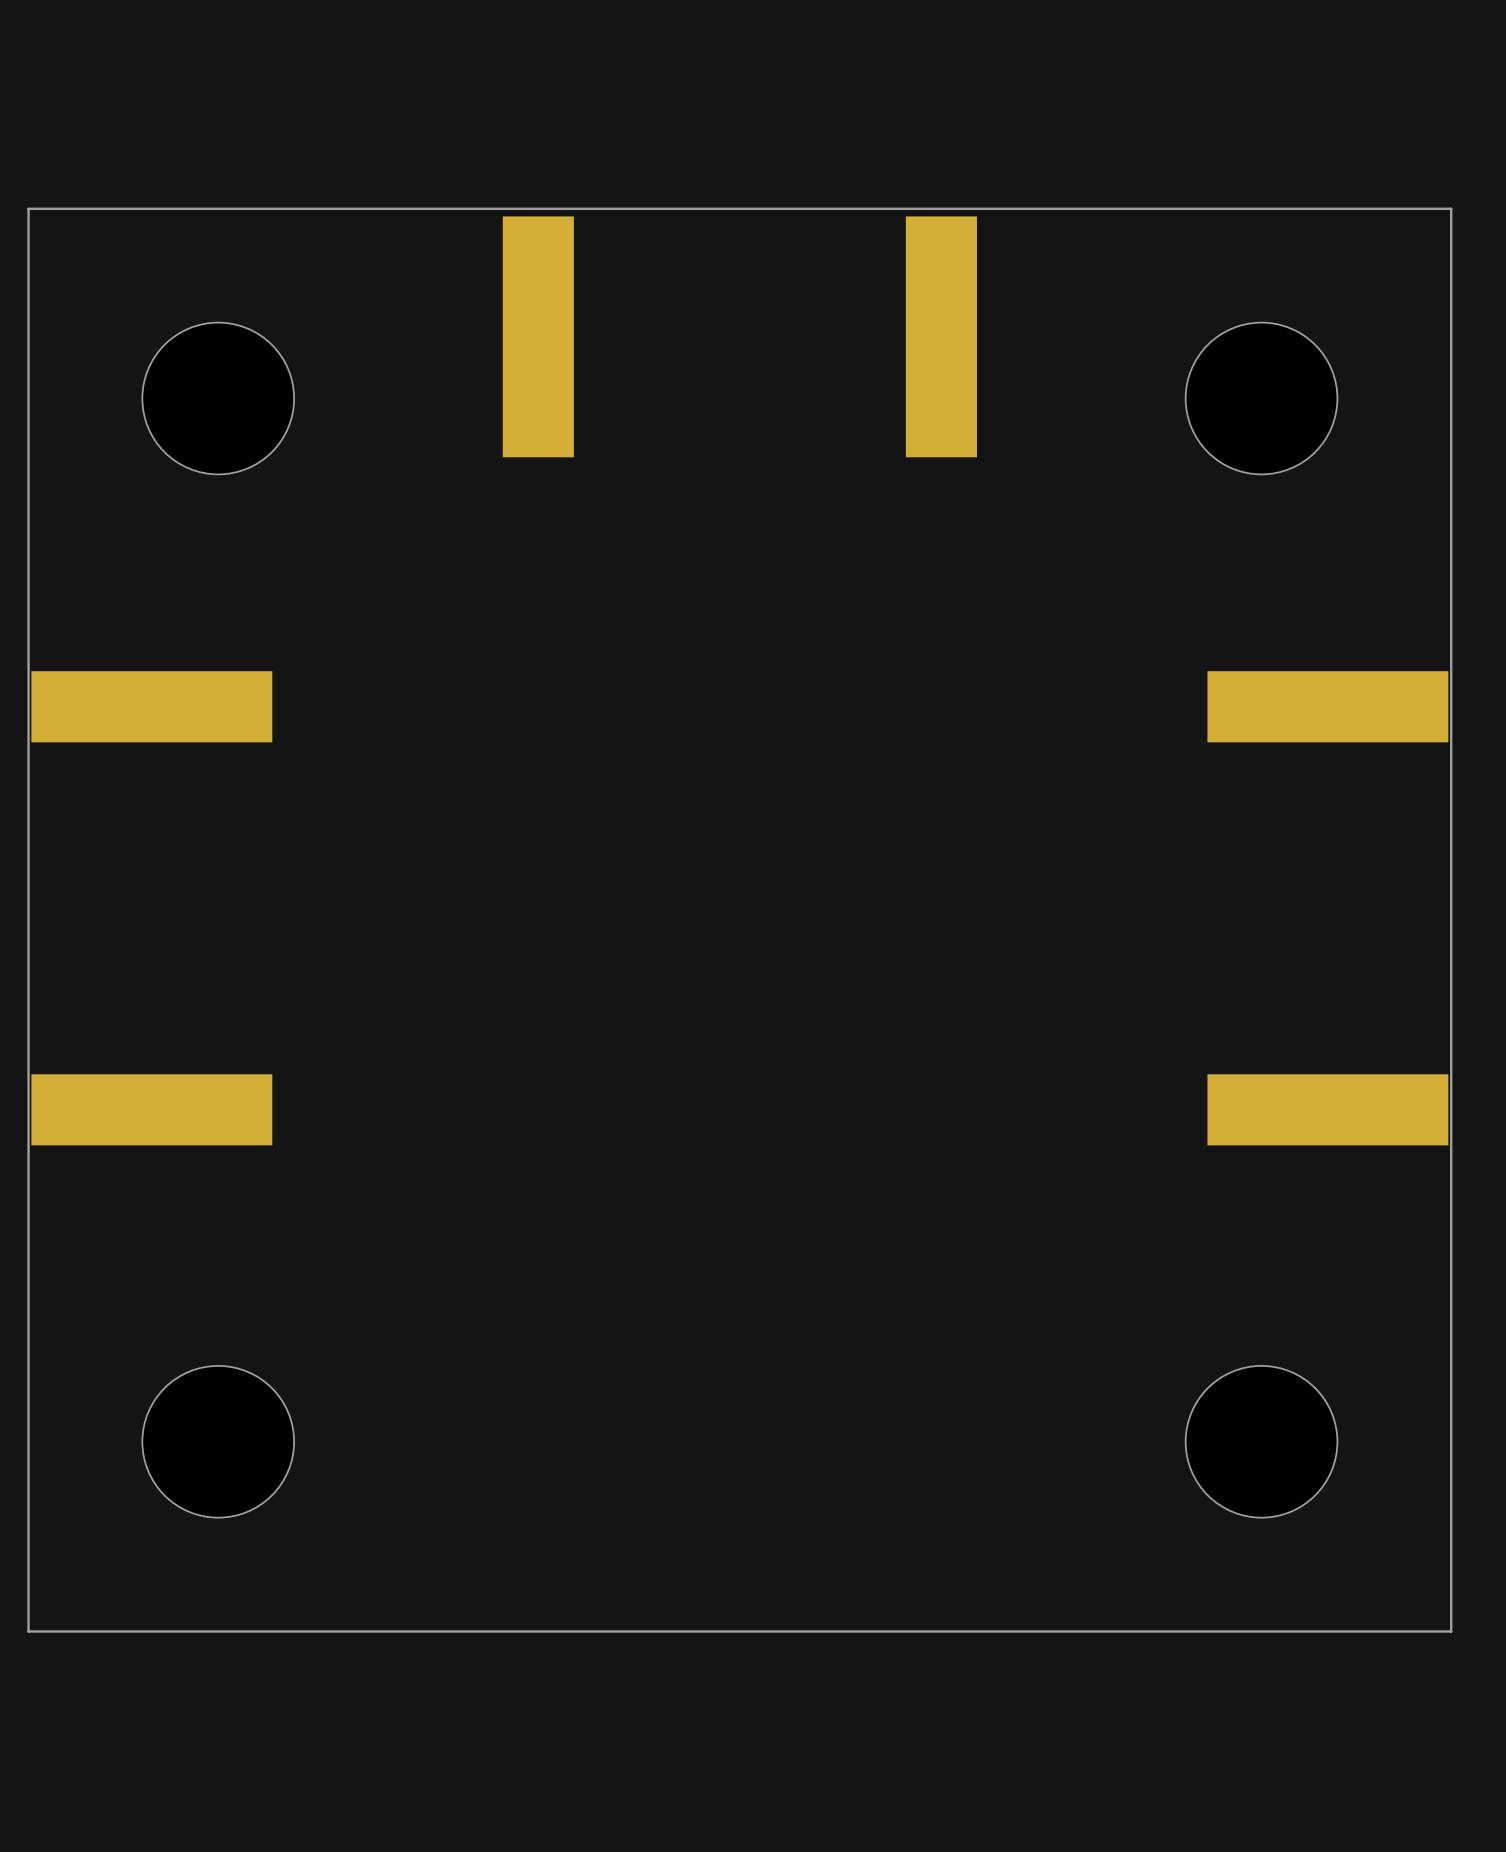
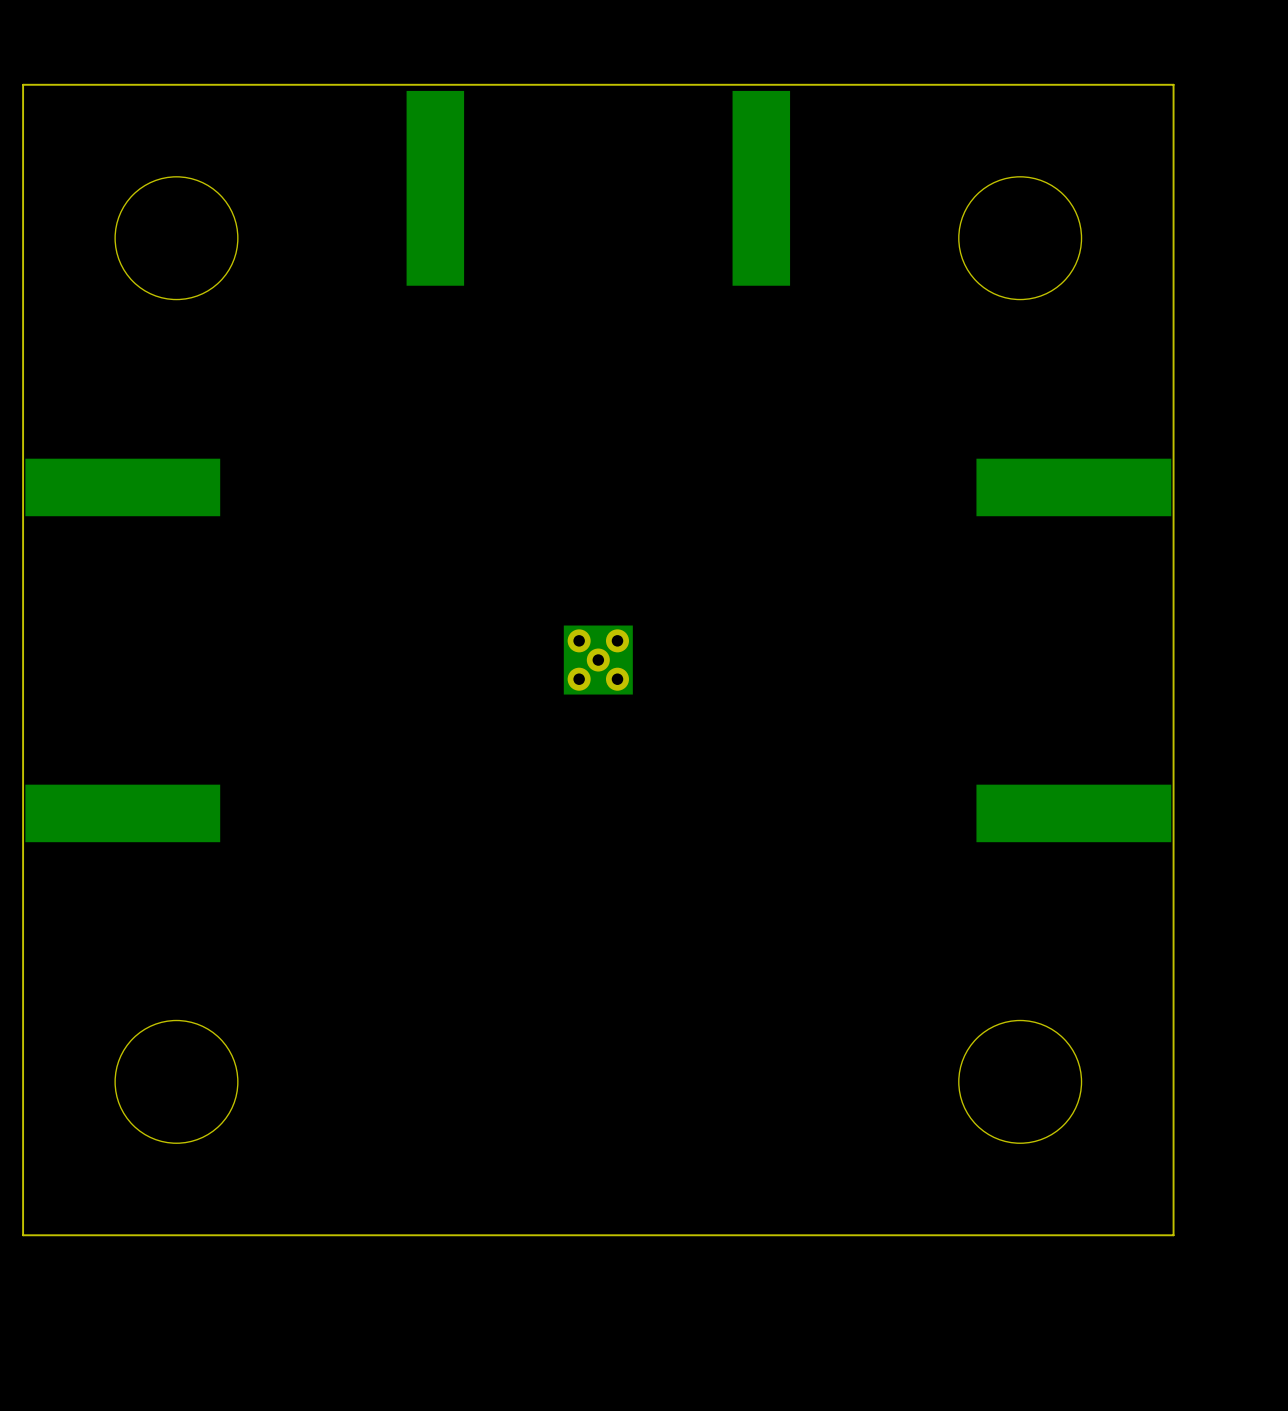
part: none -> (598, 660)

